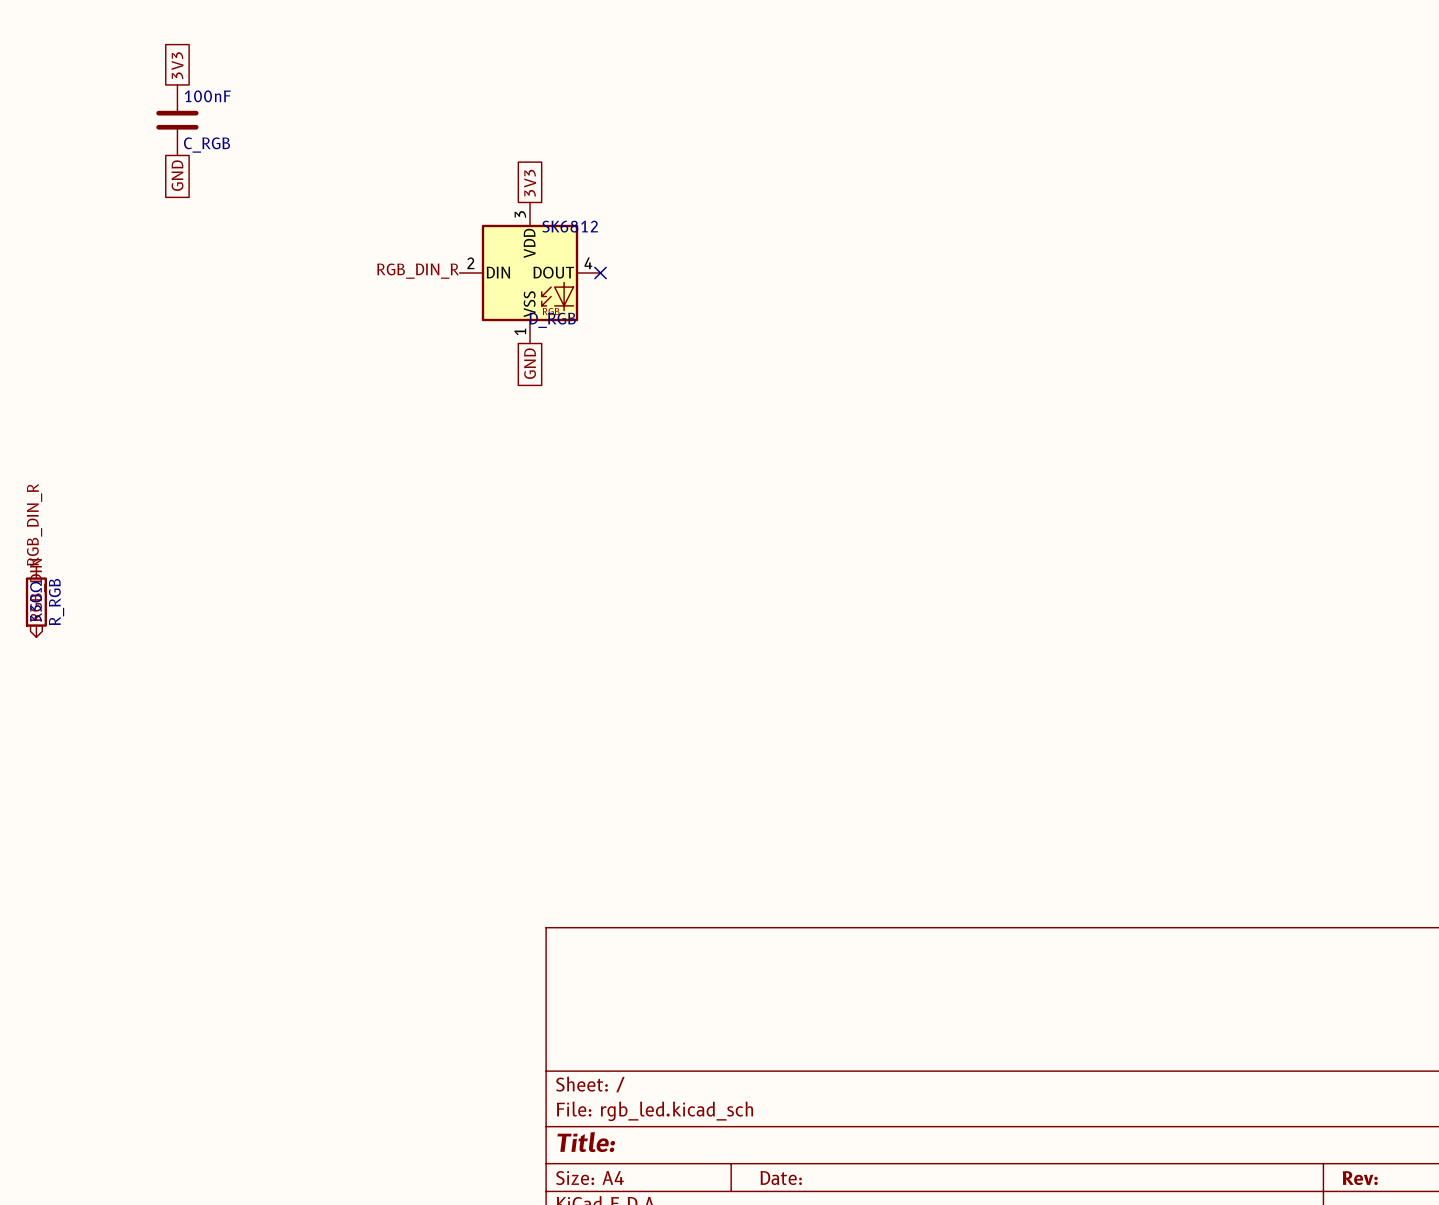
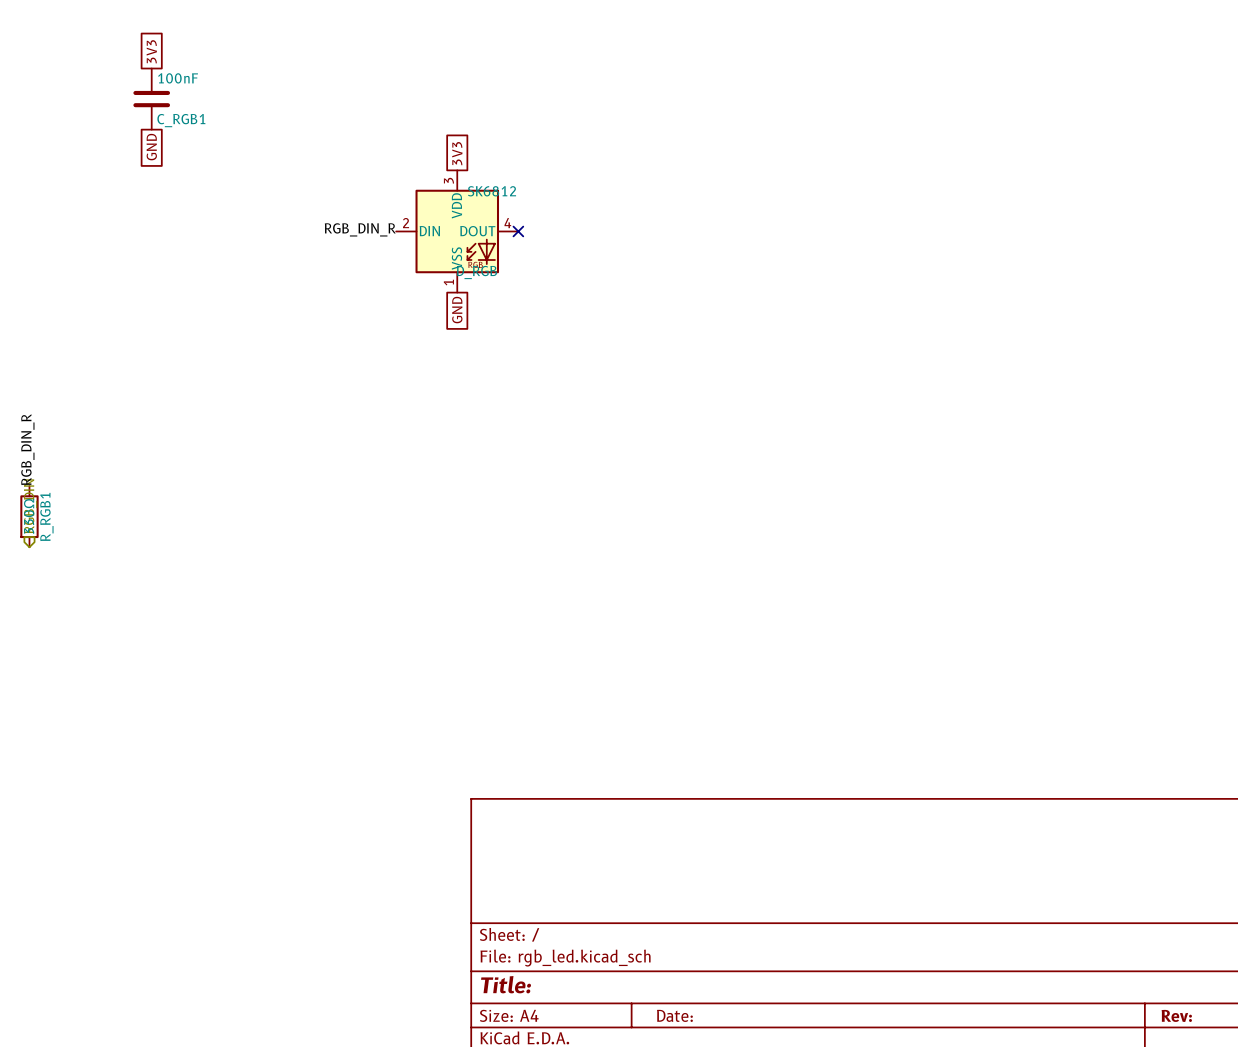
C_RGB name: C_RGB (207, 145) -> C_RGB1 (181, 120)
R_RGB name: R_RGB (56, 602) -> R_RGB1 (46, 516)

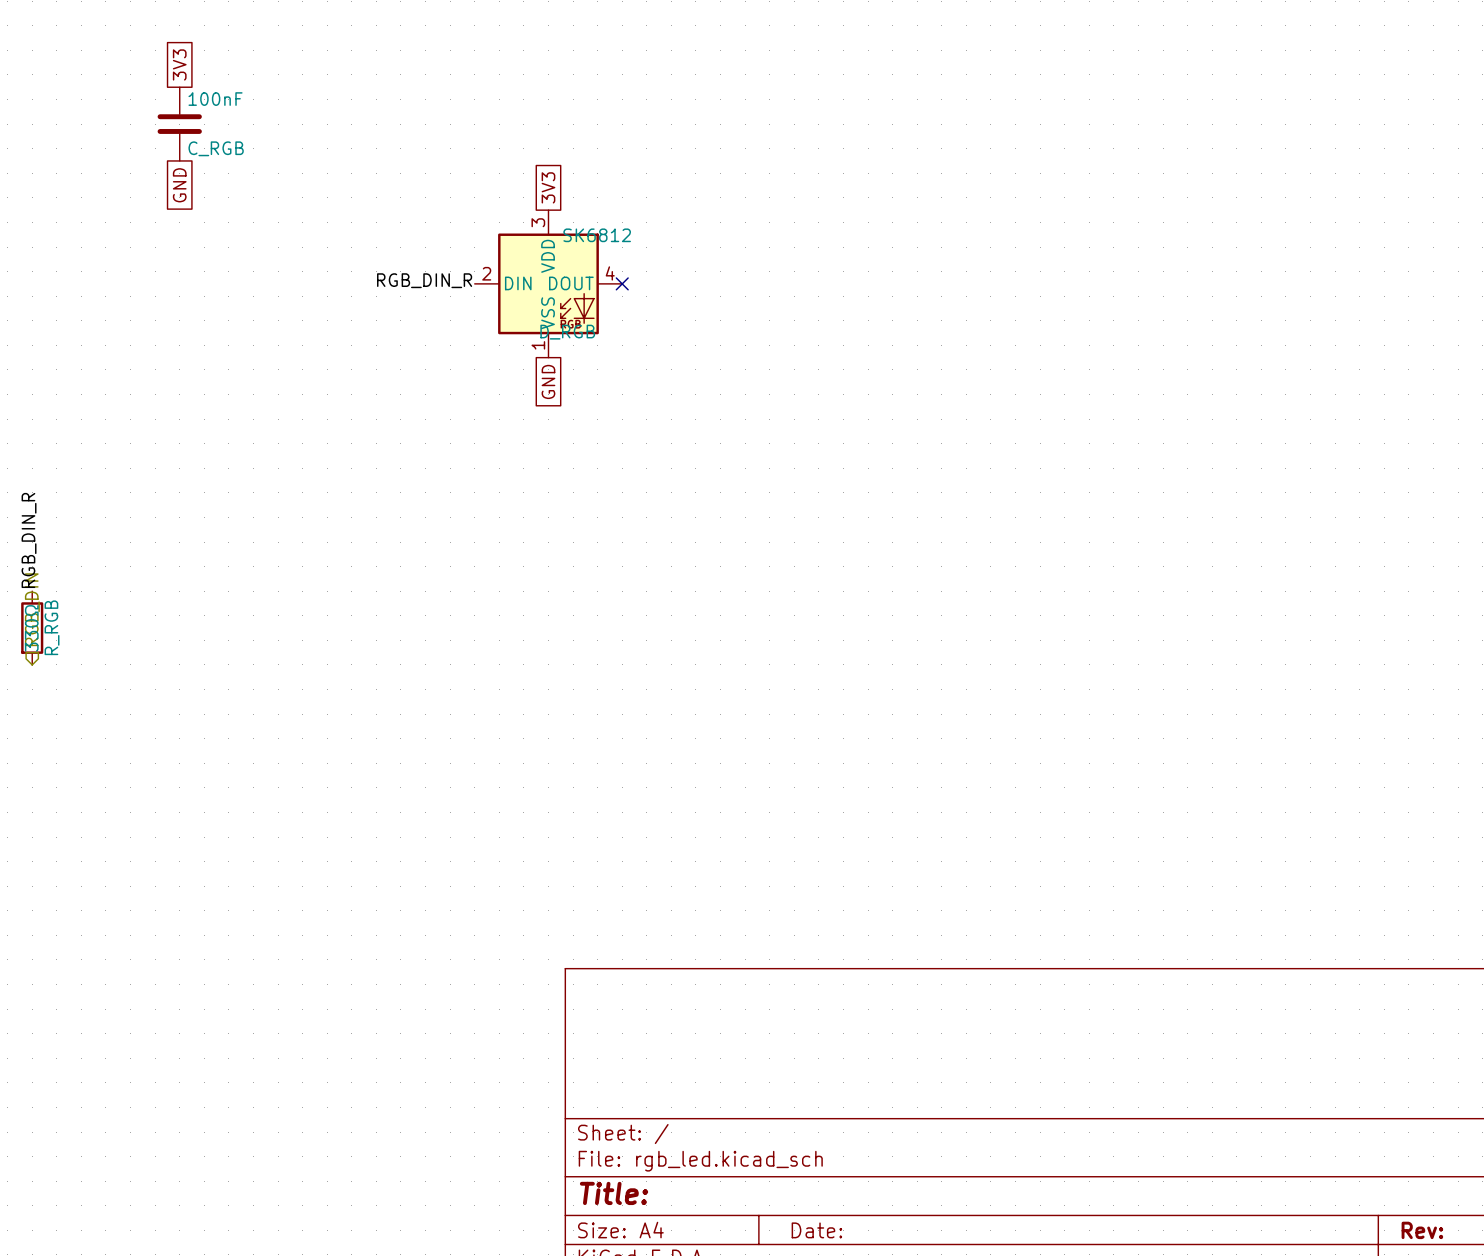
C_RGB1 name: C_RGB1 (181, 120) -> C_RGB (216, 148)
R_RGB1 name: R_RGB1 (46, 516) -> R_RGB (52, 627)

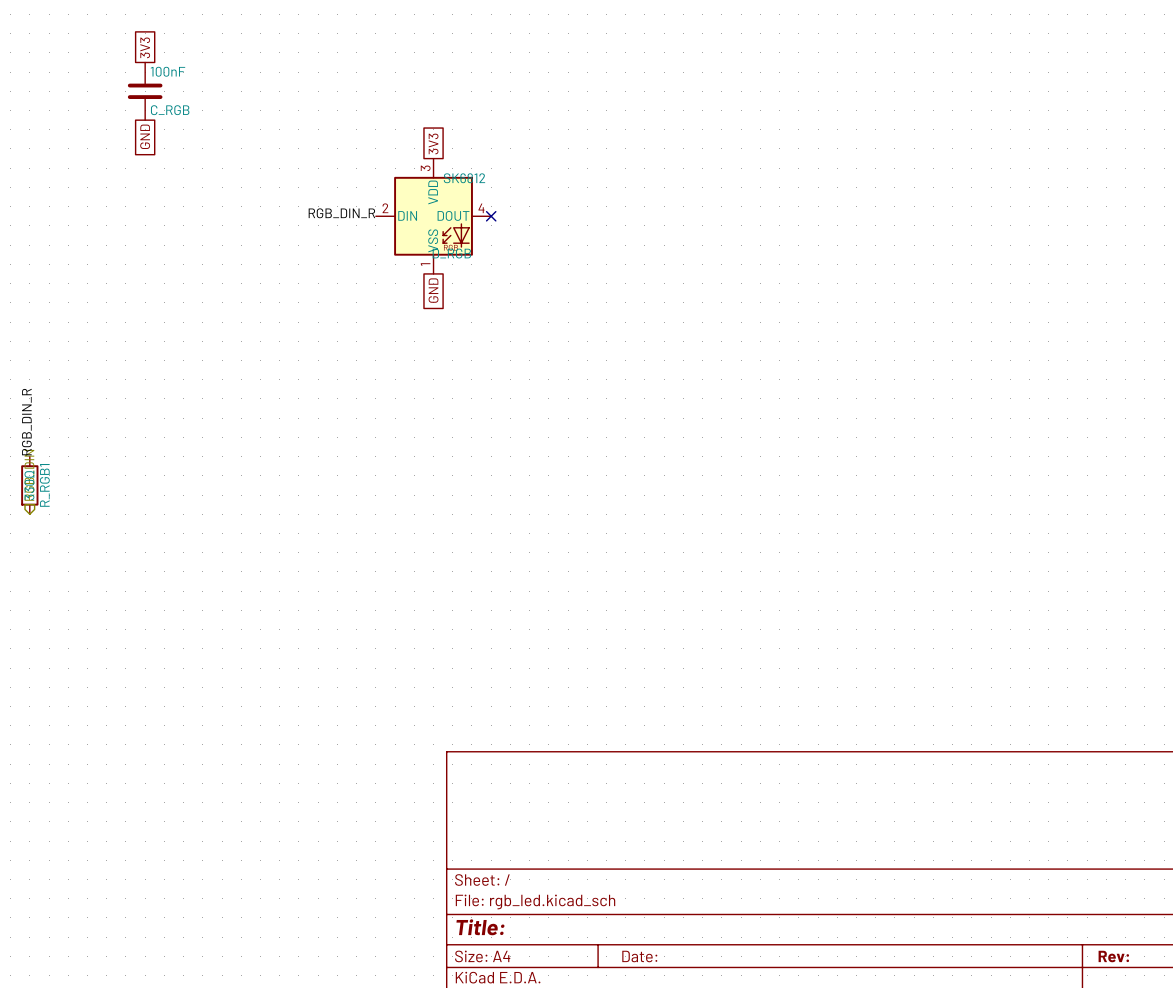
R_RGB name: R_RGB (52, 627) -> R_RGB1 (44, 485)

